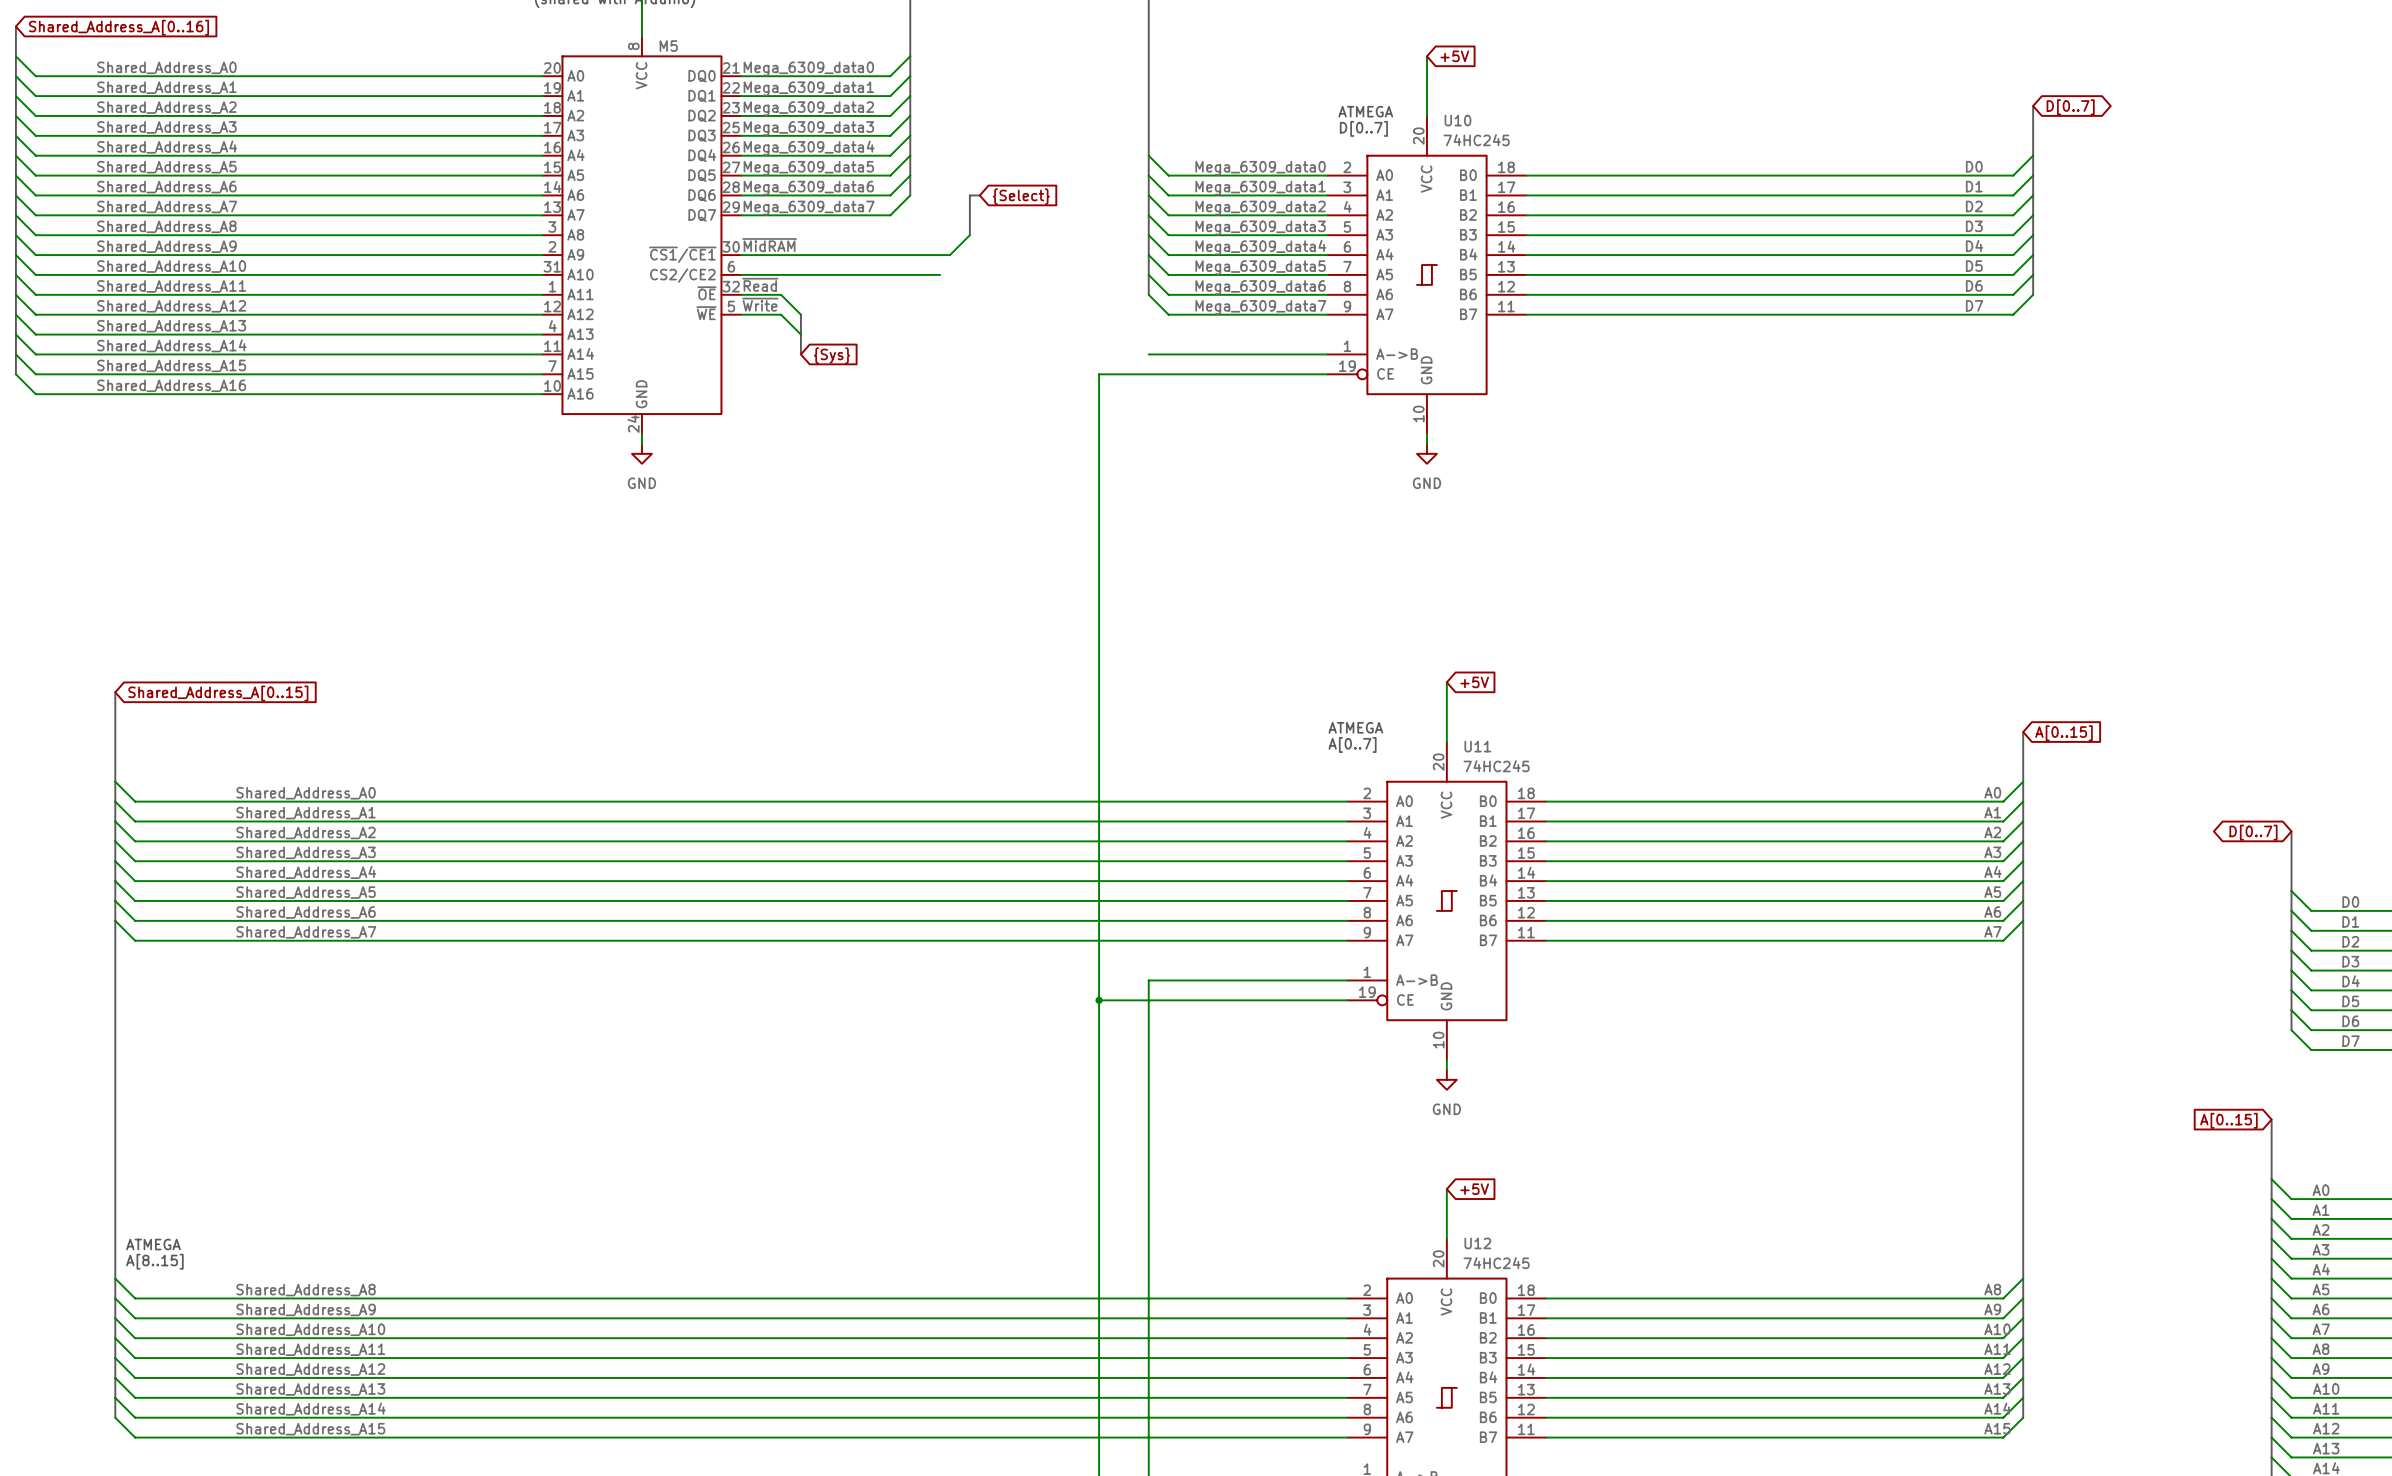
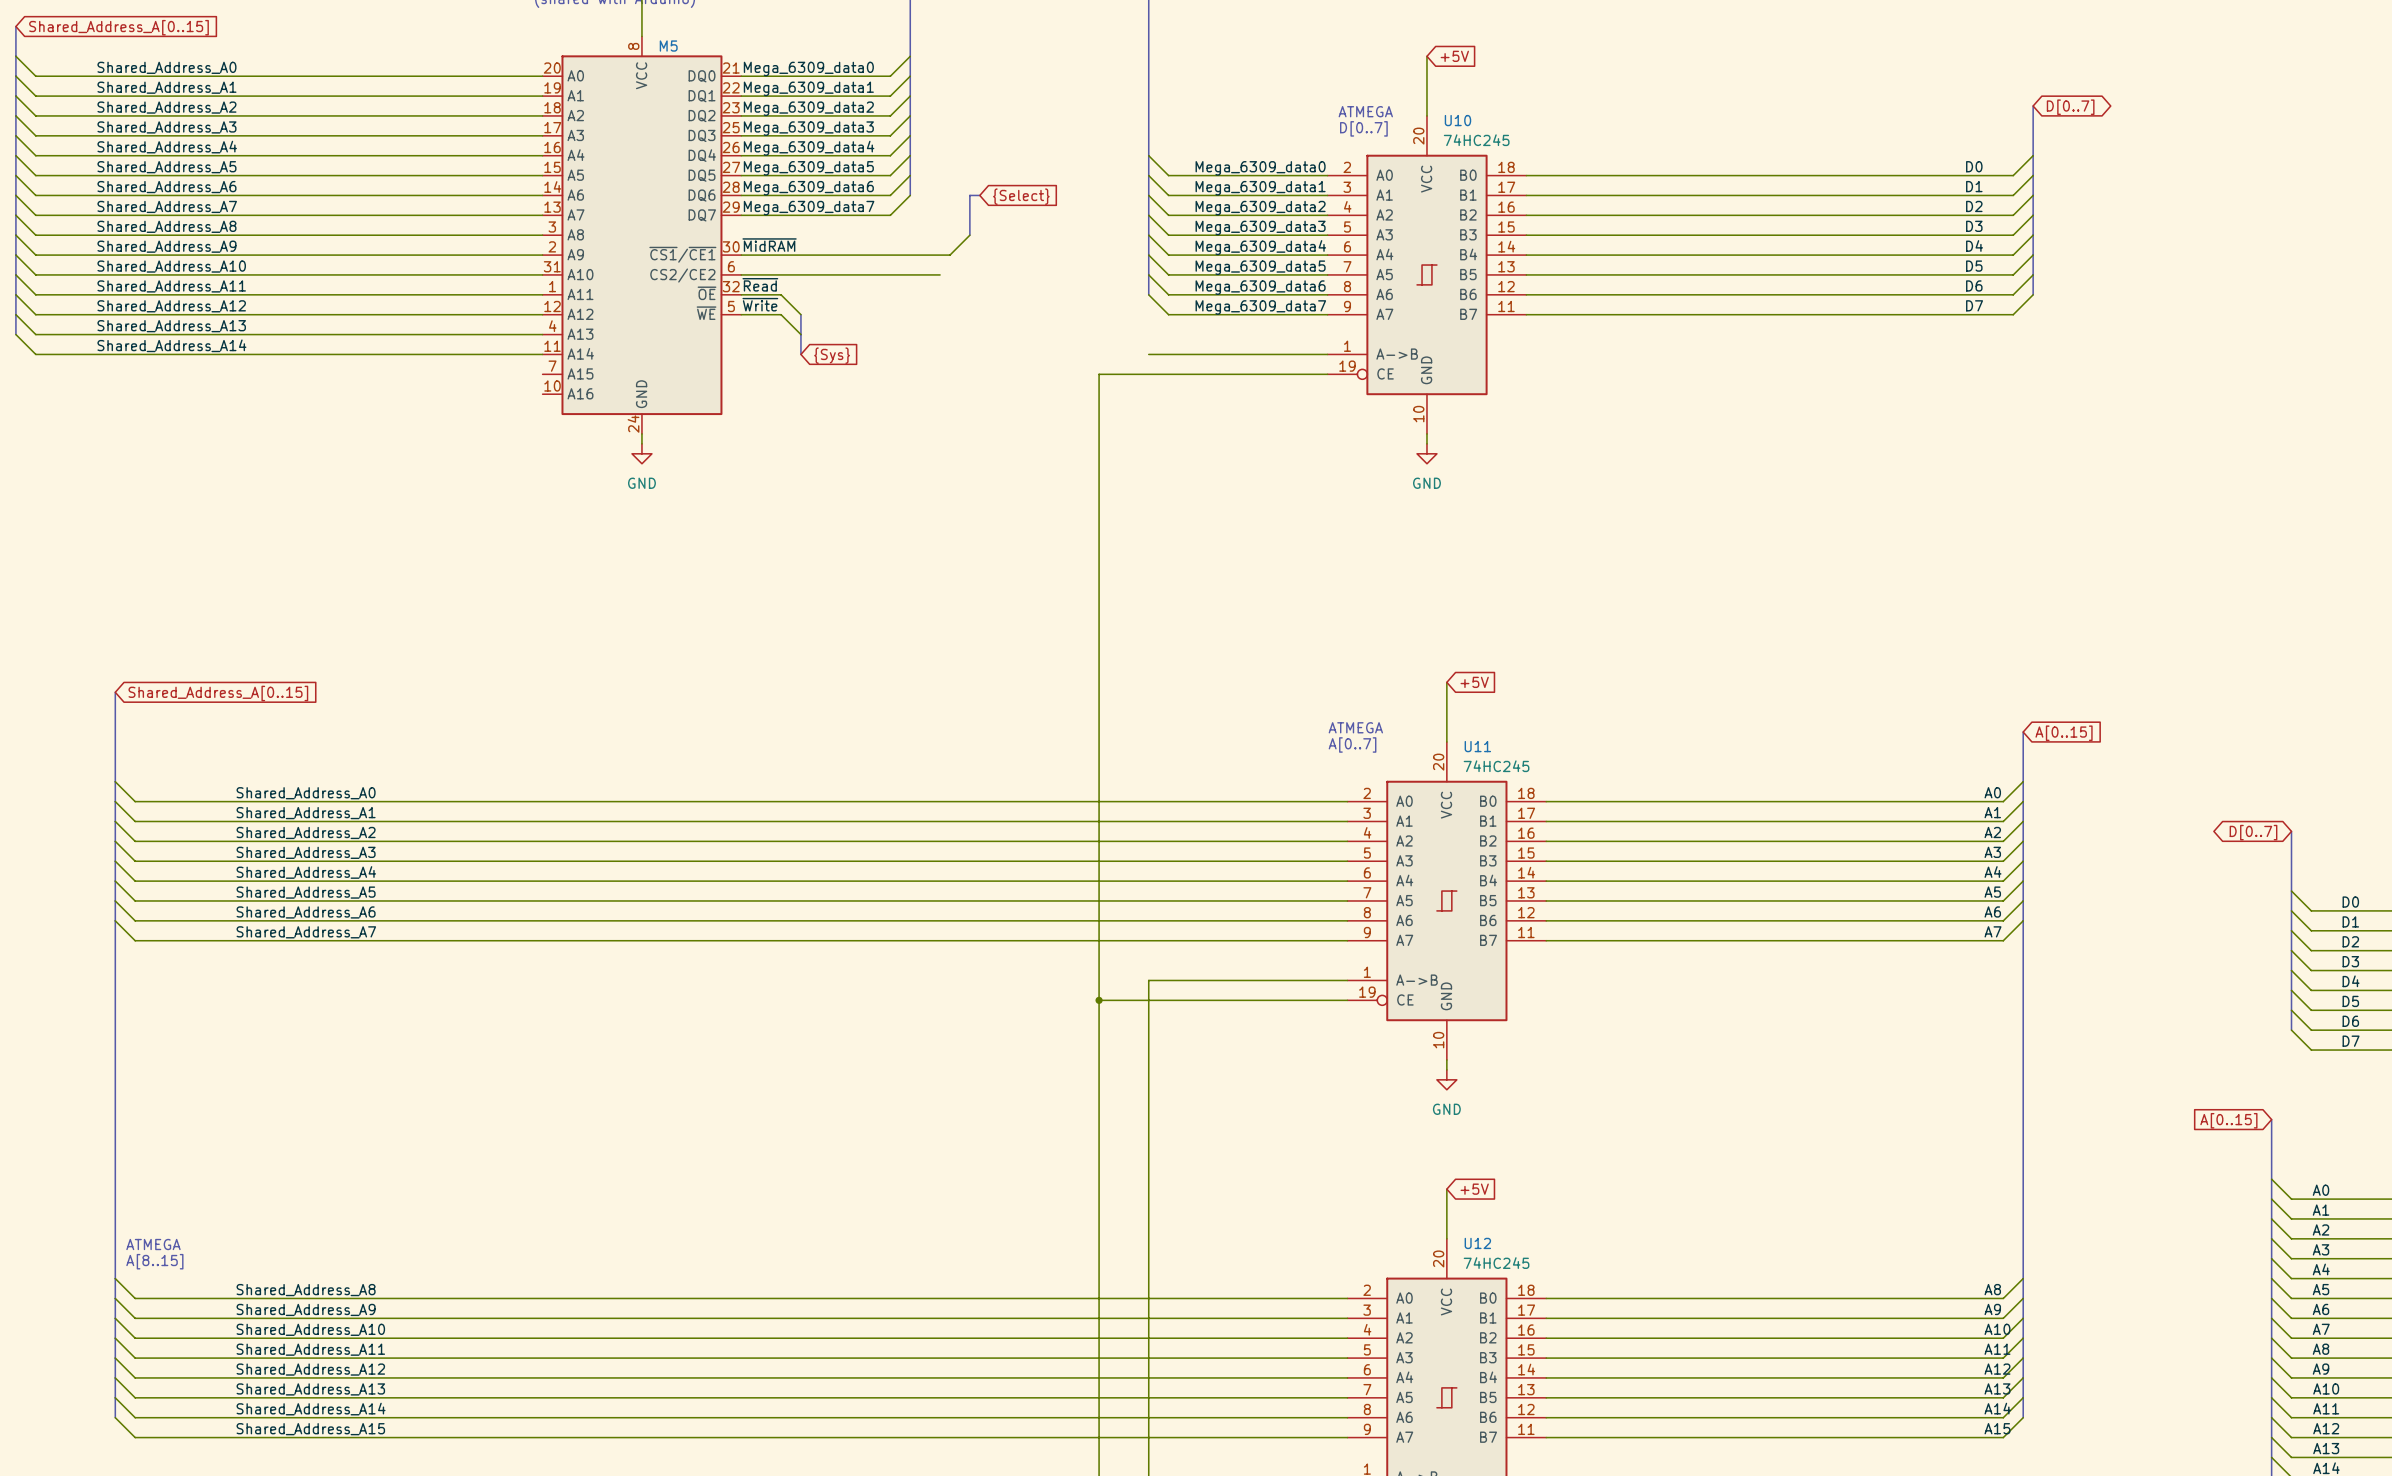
global label: Shared_Address_A[0..16] (118, 27) -> Shared_Address_A[0..15] (118, 27)
bus: (15, 334) (15, 374) -> none
wire: (15, 354) (35, 374) (542, 374) -> none
label: Shared_Address_A15 (171, 365) -> none
wire: (15, 374) (35, 394) (542, 394) -> none
label: Shared_Address_A16 (171, 385) -> none

